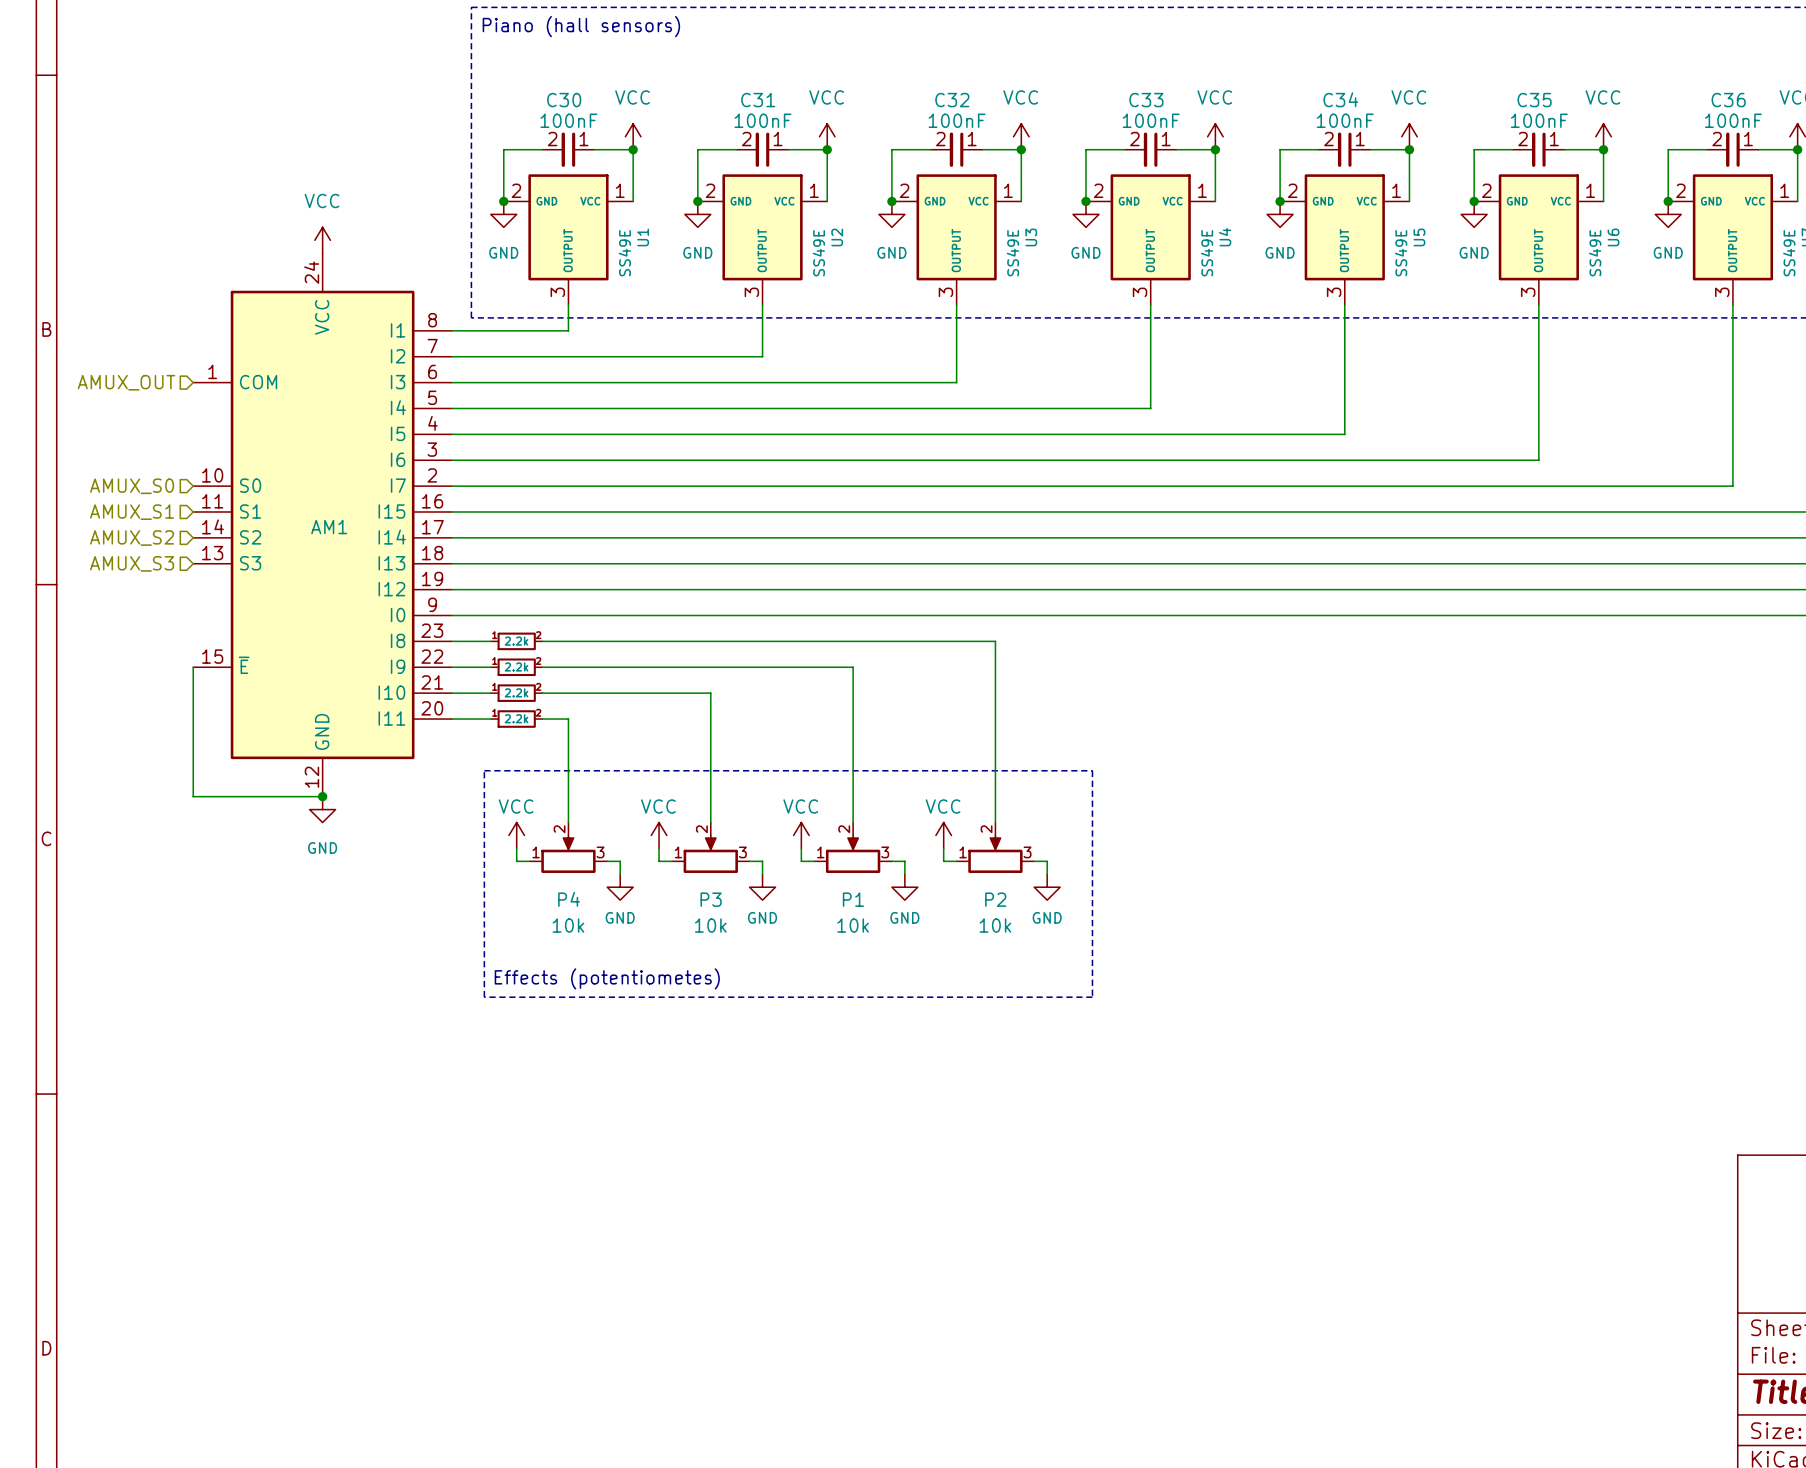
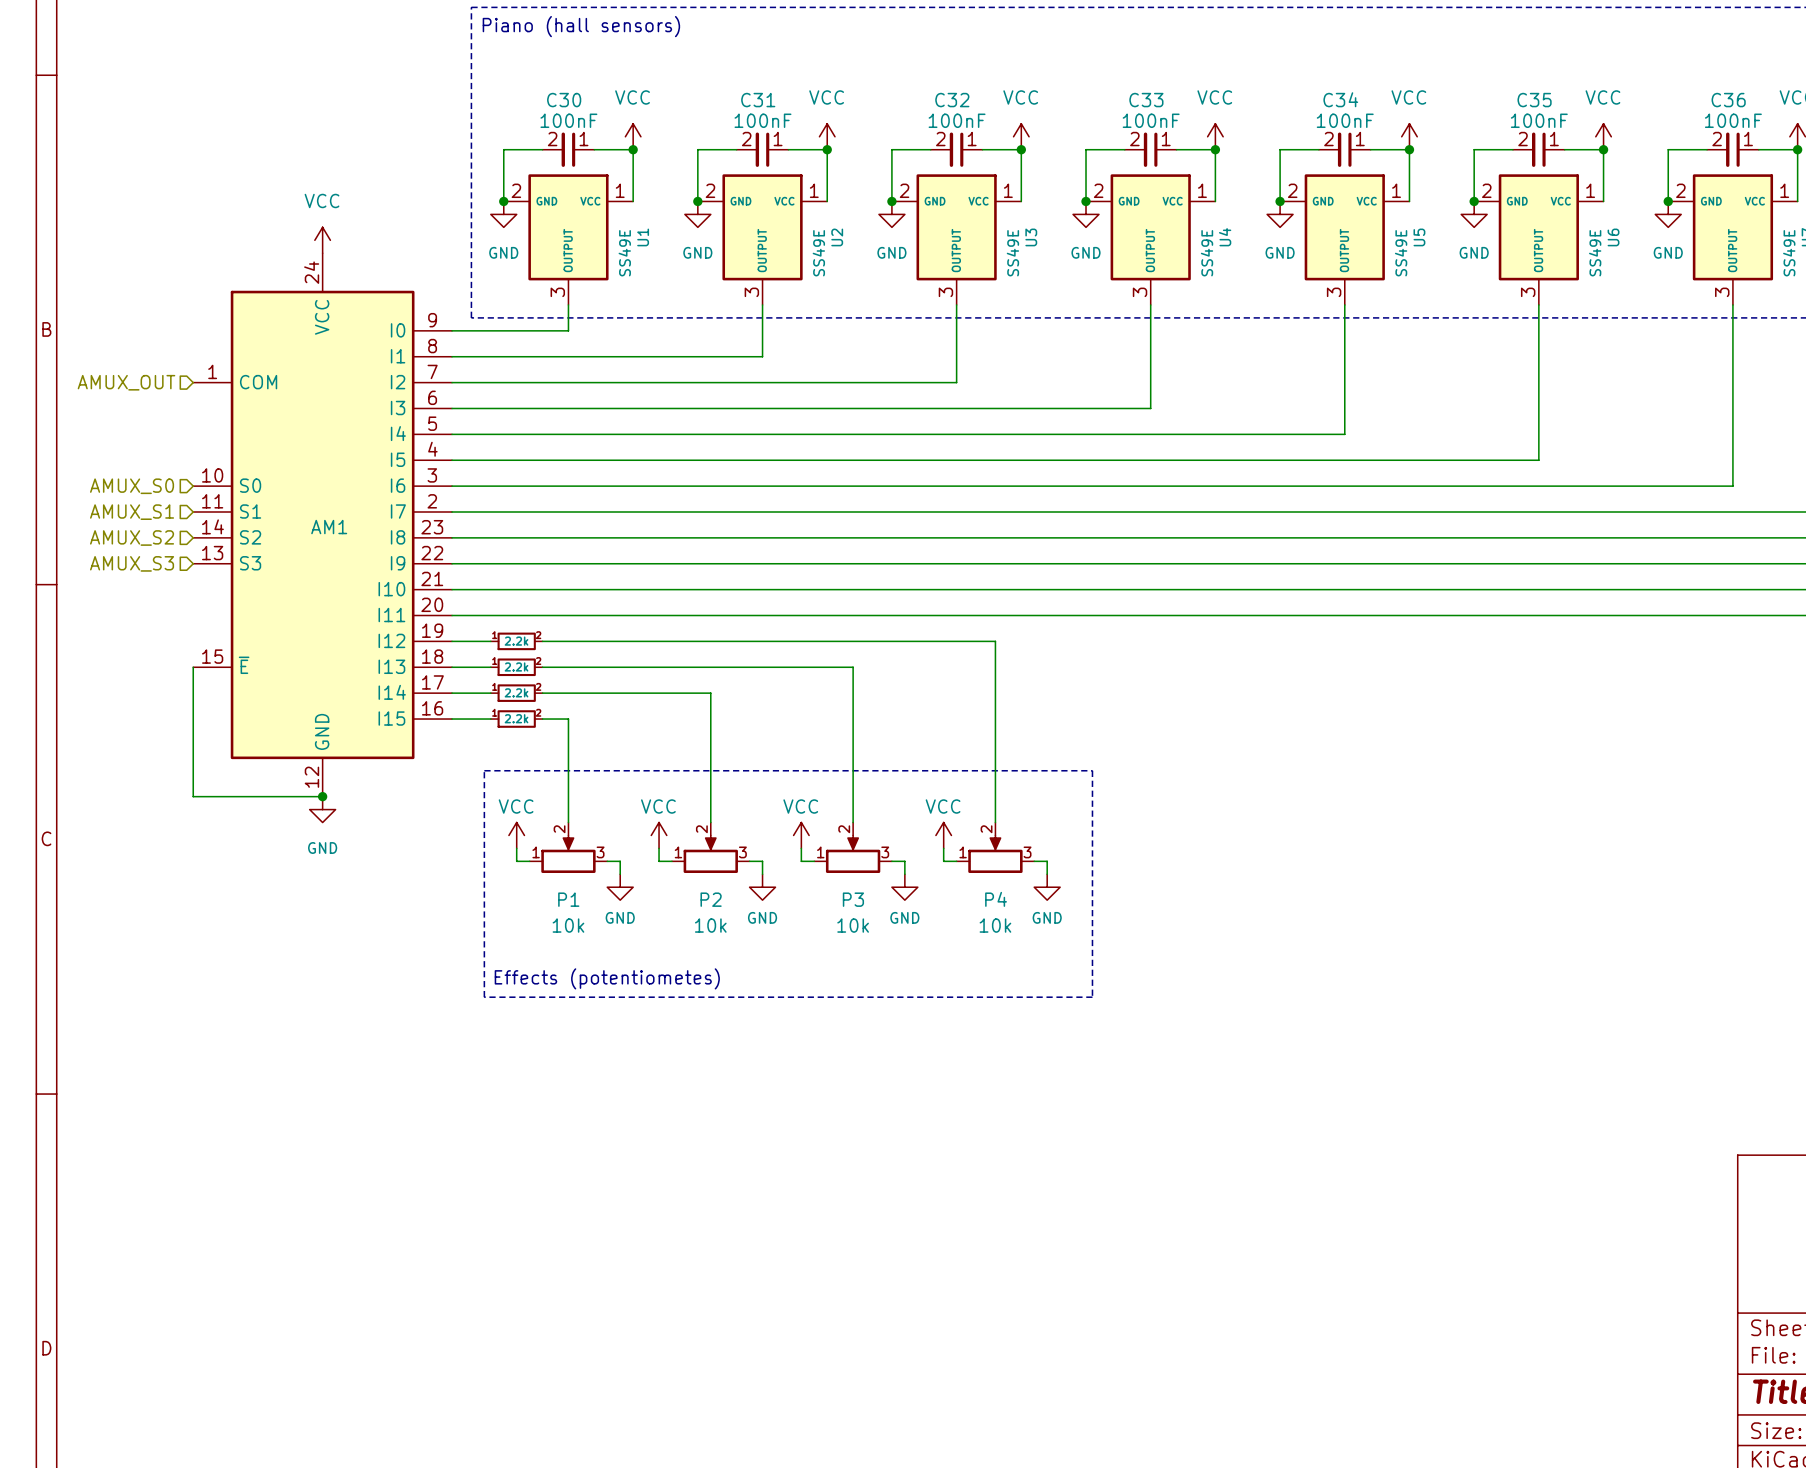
AM1 symbol: [193, 253, 453, 797] -> [193, 253, 453, 797]
P4 name: P4 (569, 899) -> P1 (568, 899)
P3 name: P3 (711, 899) -> P2 (711, 899)
P1 name: P1 (853, 899) -> P3 (853, 899)
P2 name: P2 (995, 899) -> P4 (996, 899)

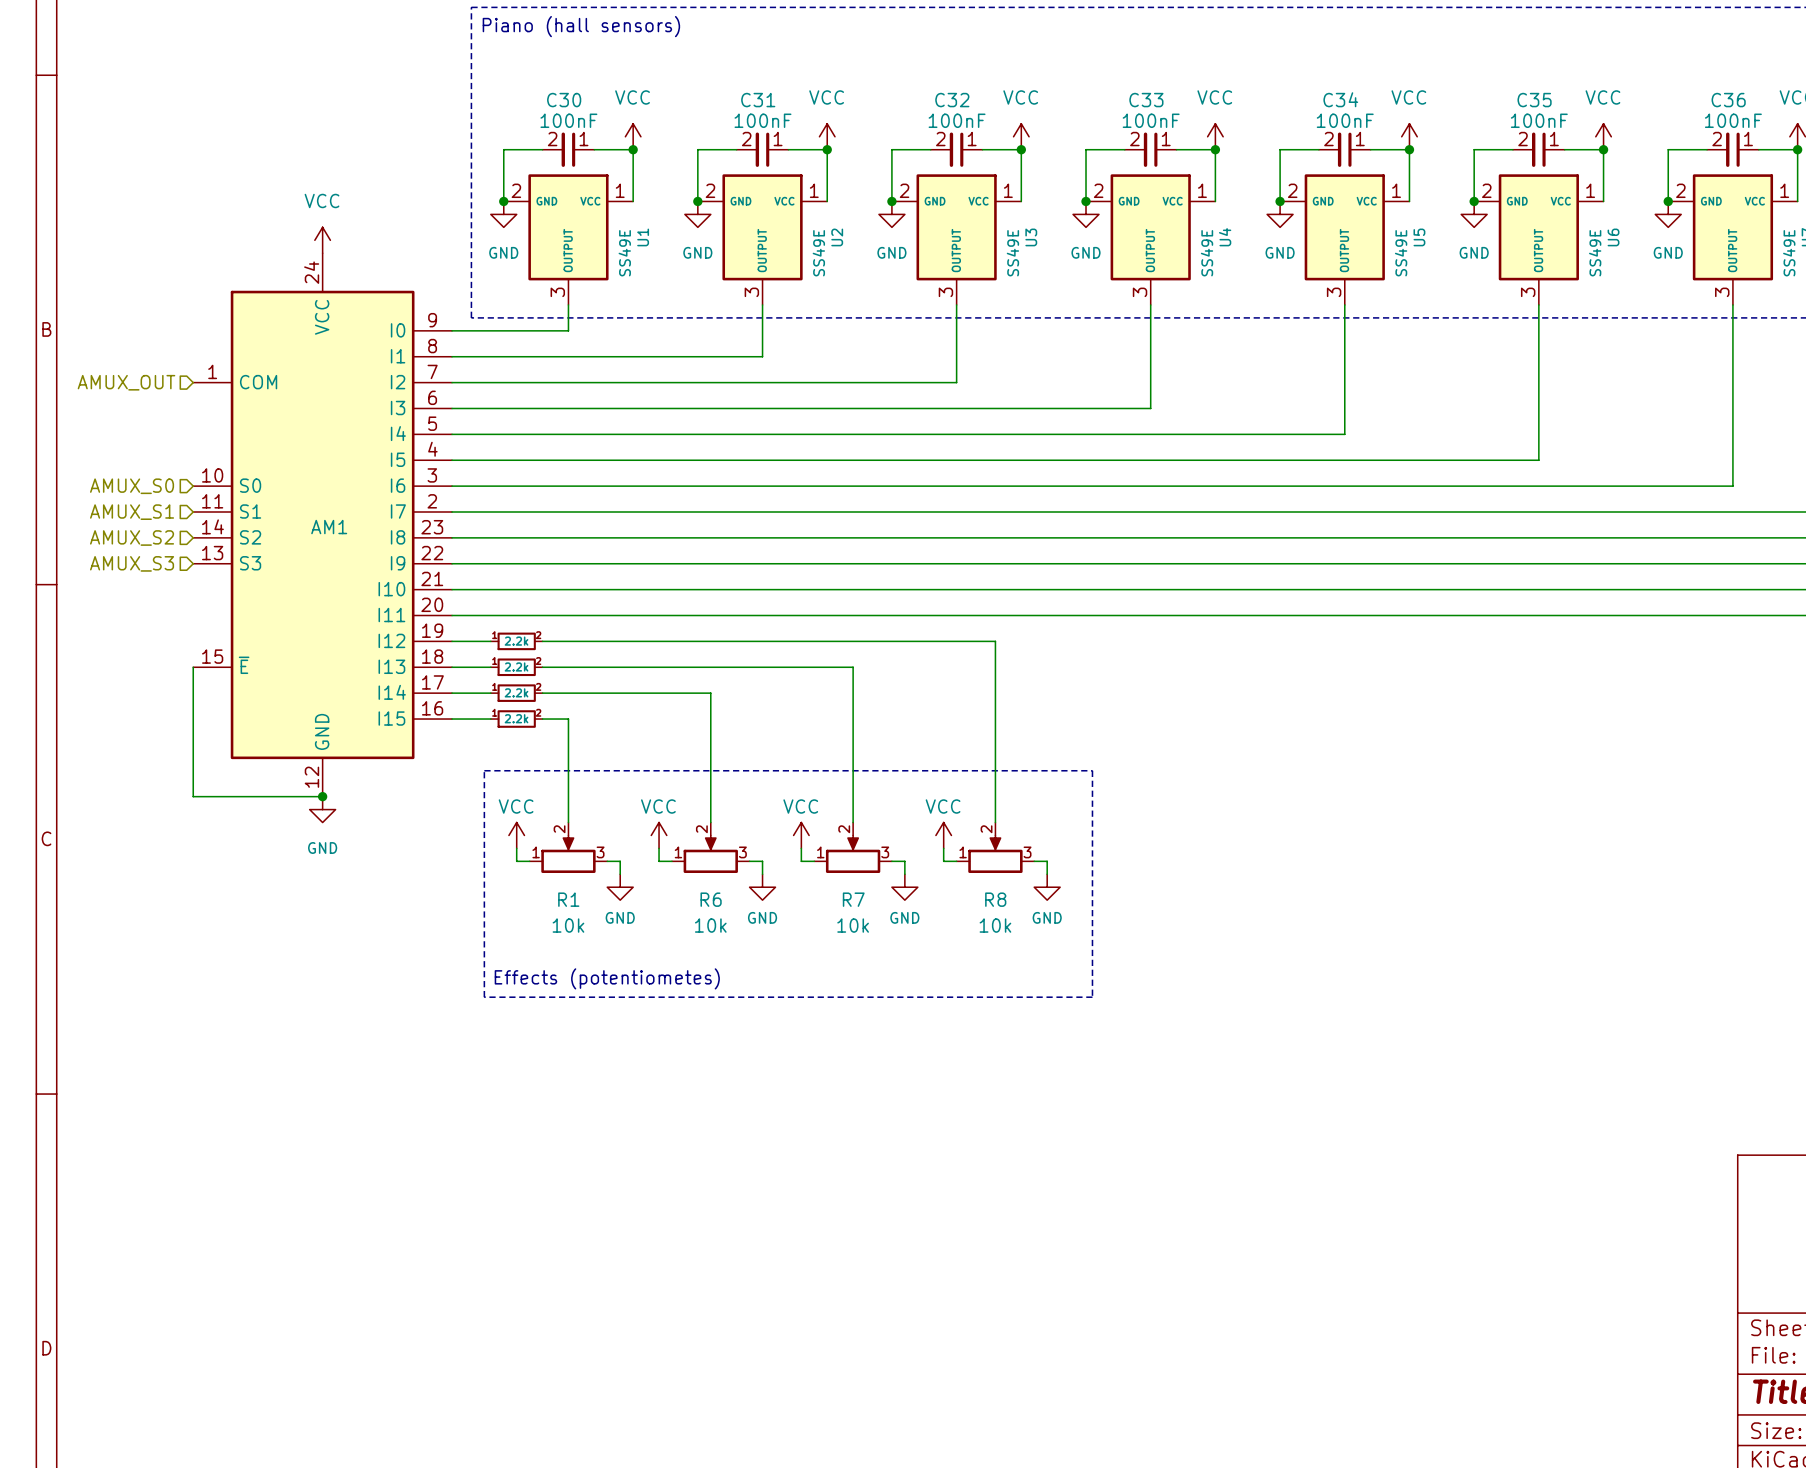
P1 name: P1 (568, 899) -> R1 (568, 899)
P2 name: P2 (711, 899) -> R6 (711, 899)
P3 name: P3 (853, 899) -> R7 (853, 899)
P4 name: P4 (996, 899) -> R8 (995, 899)

